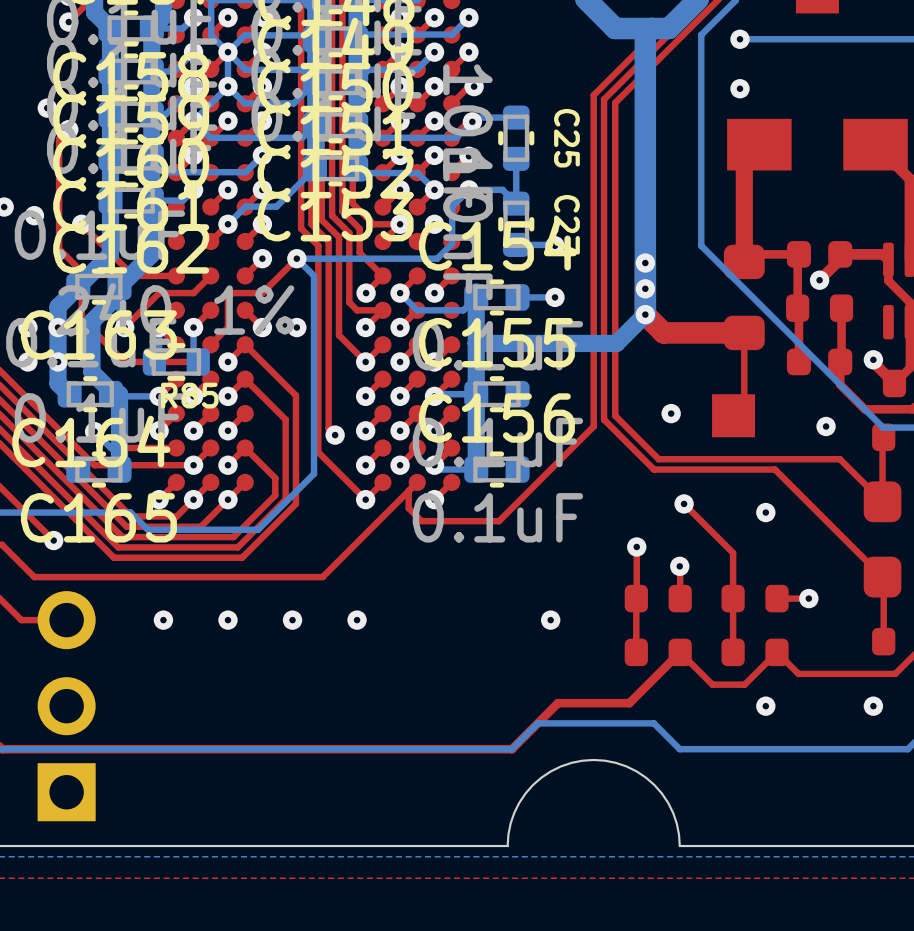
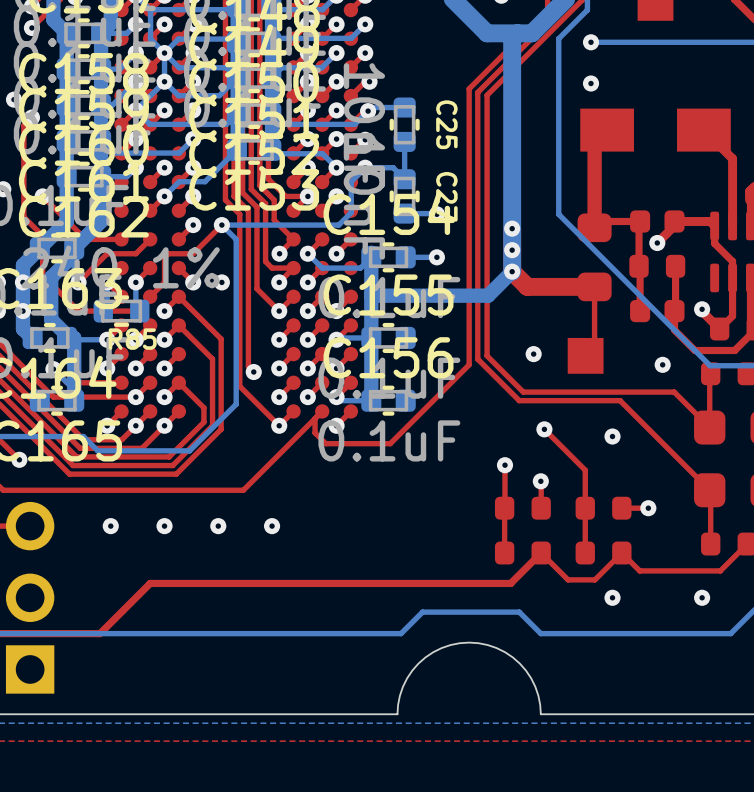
via: (550, 620) -> none
top track: (643, 688) (629, 703) (558, 703) (511, 749) (150, 749) -> (510, 583) (150, 583) (100, 633)

